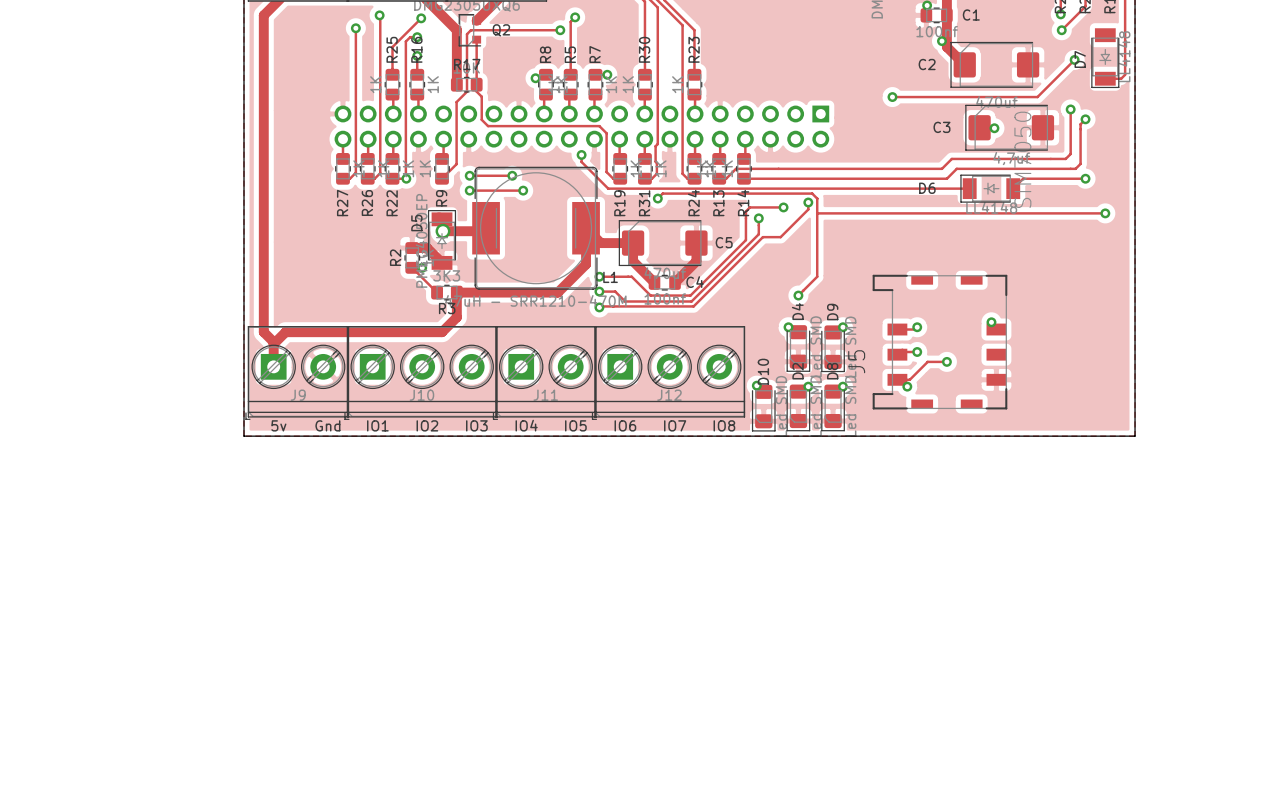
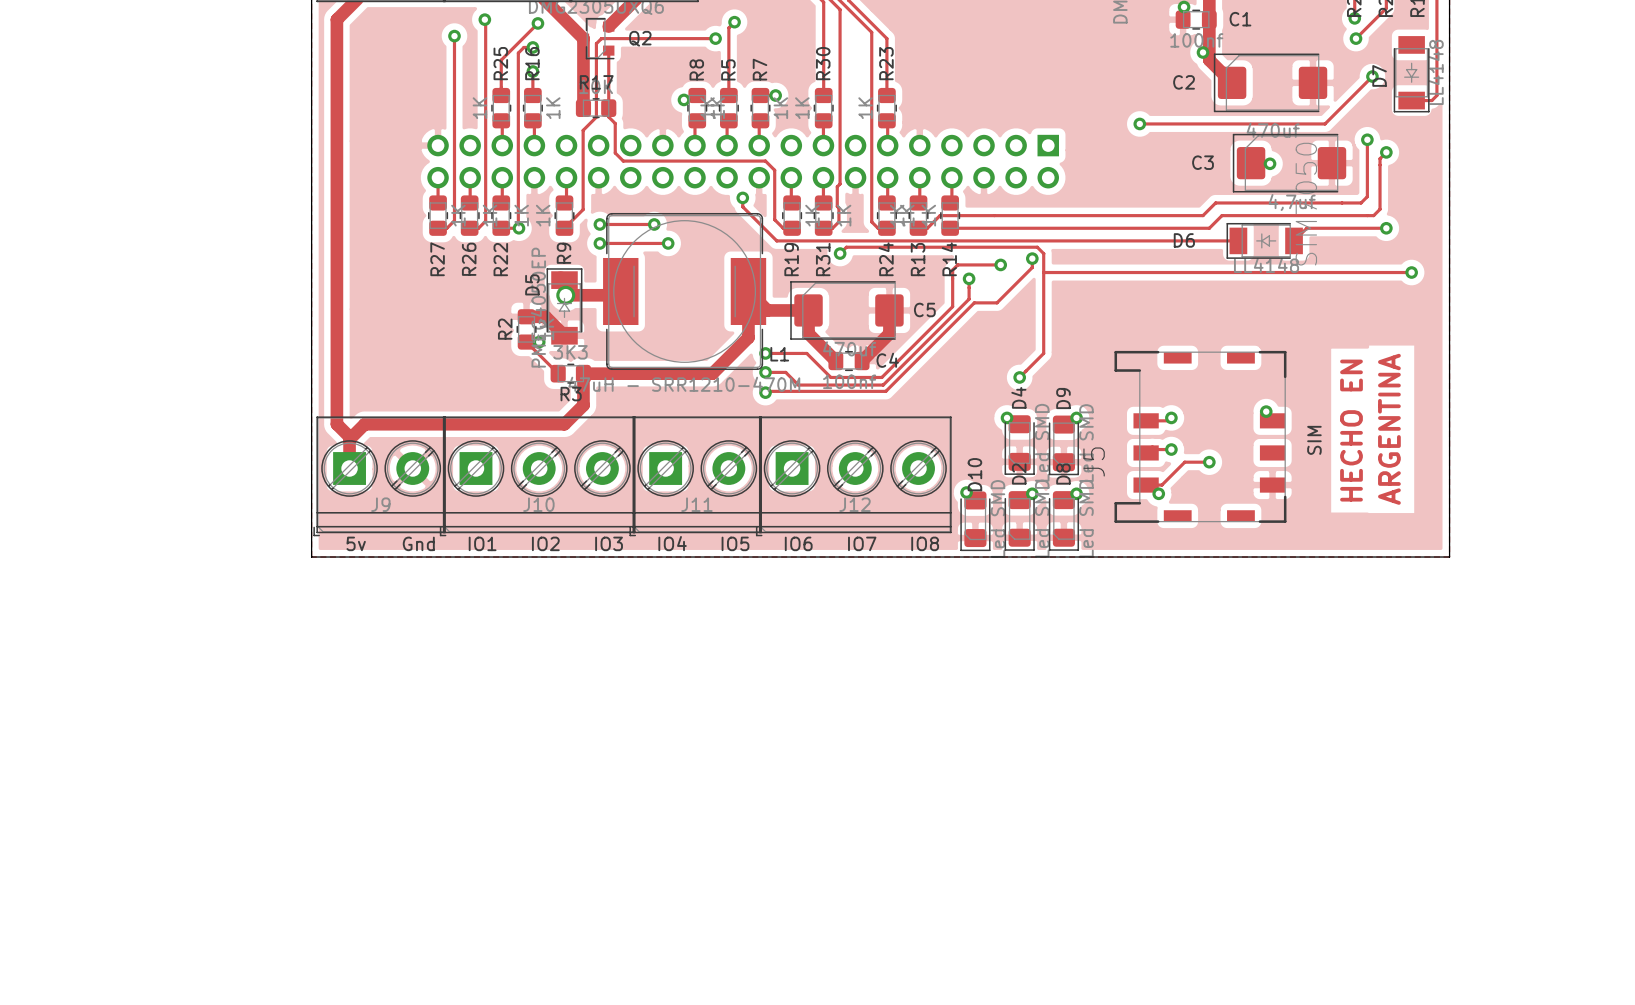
text: none -> ARGENTINA (1389, 429)
text: none -> HECHO EN (1351, 430)
text: none -> SIM (1314, 440)

